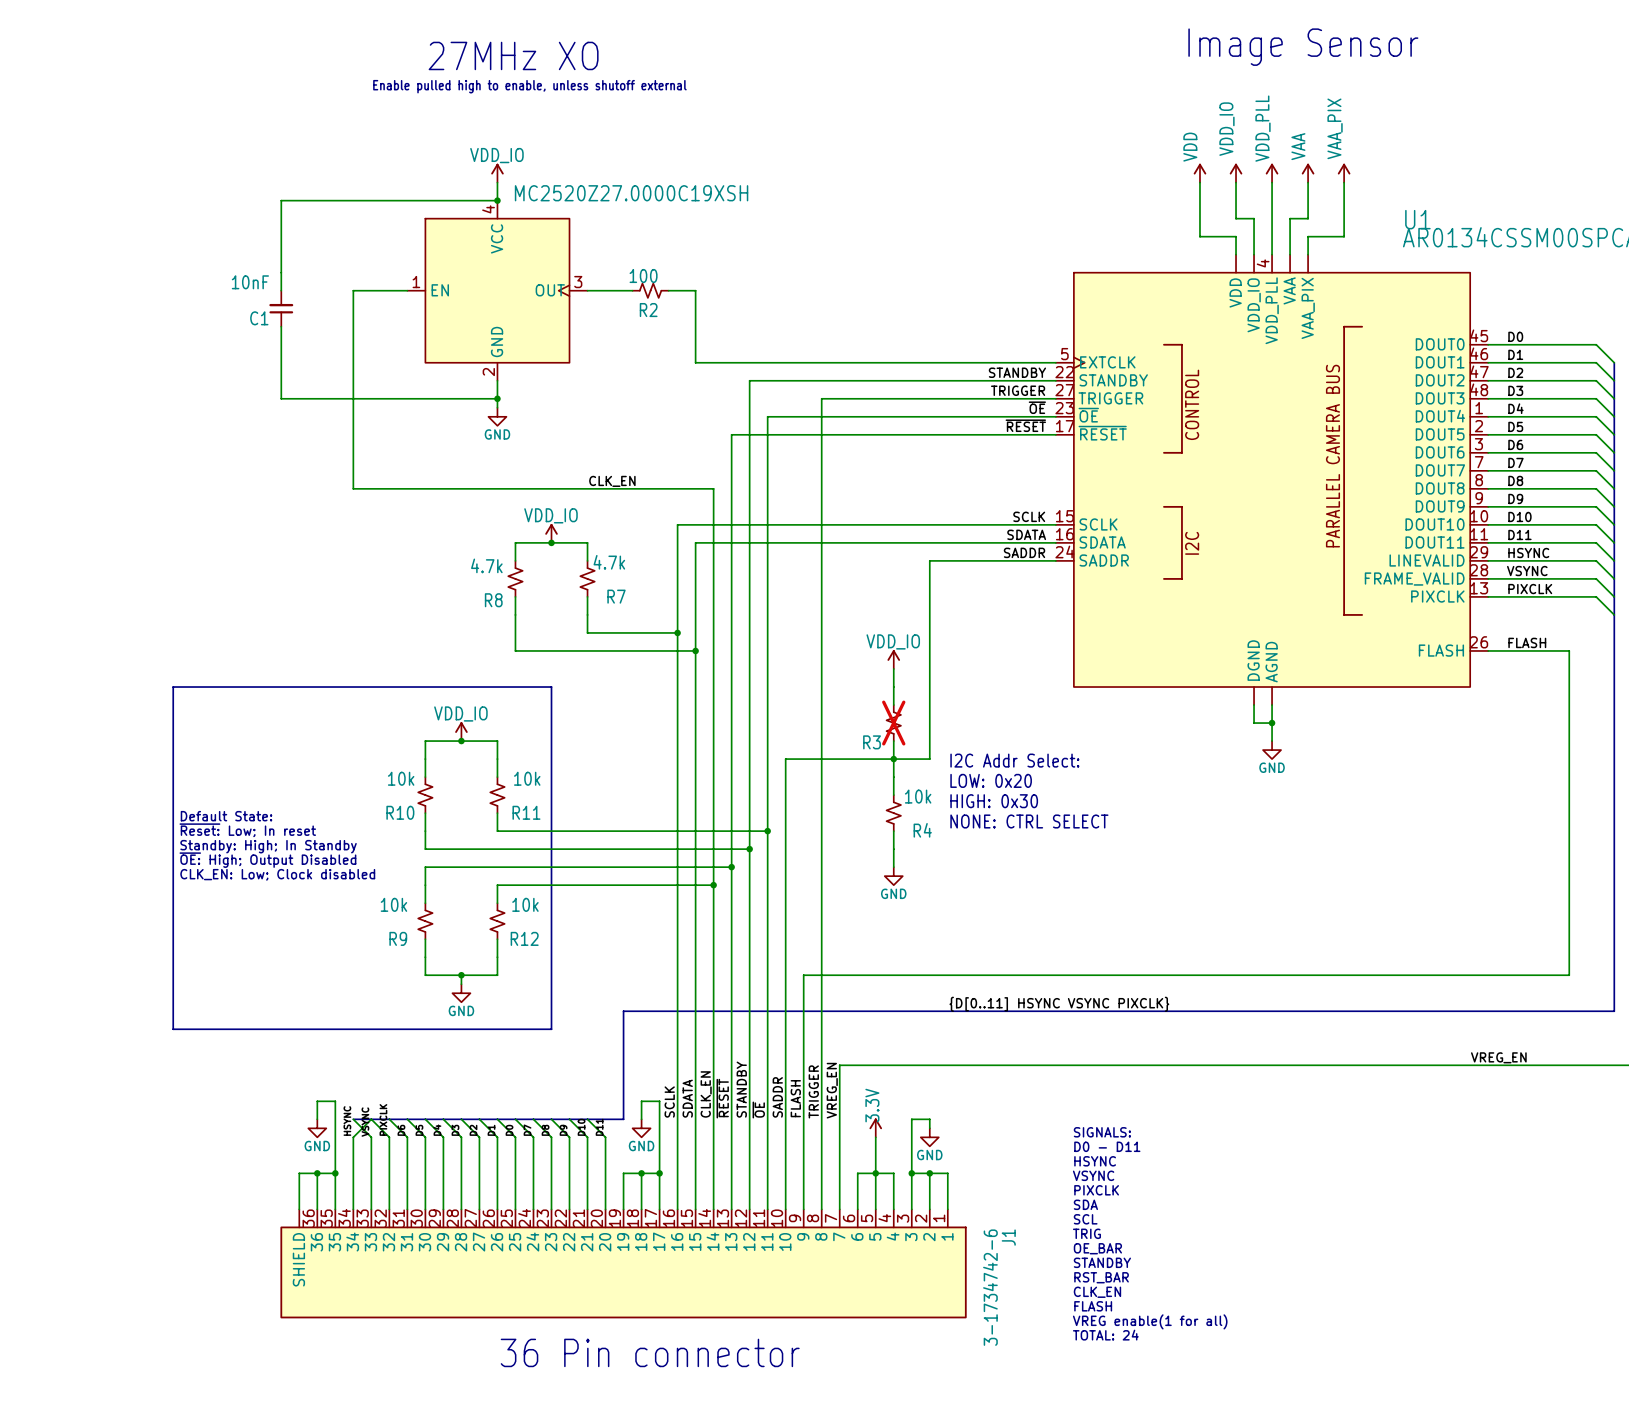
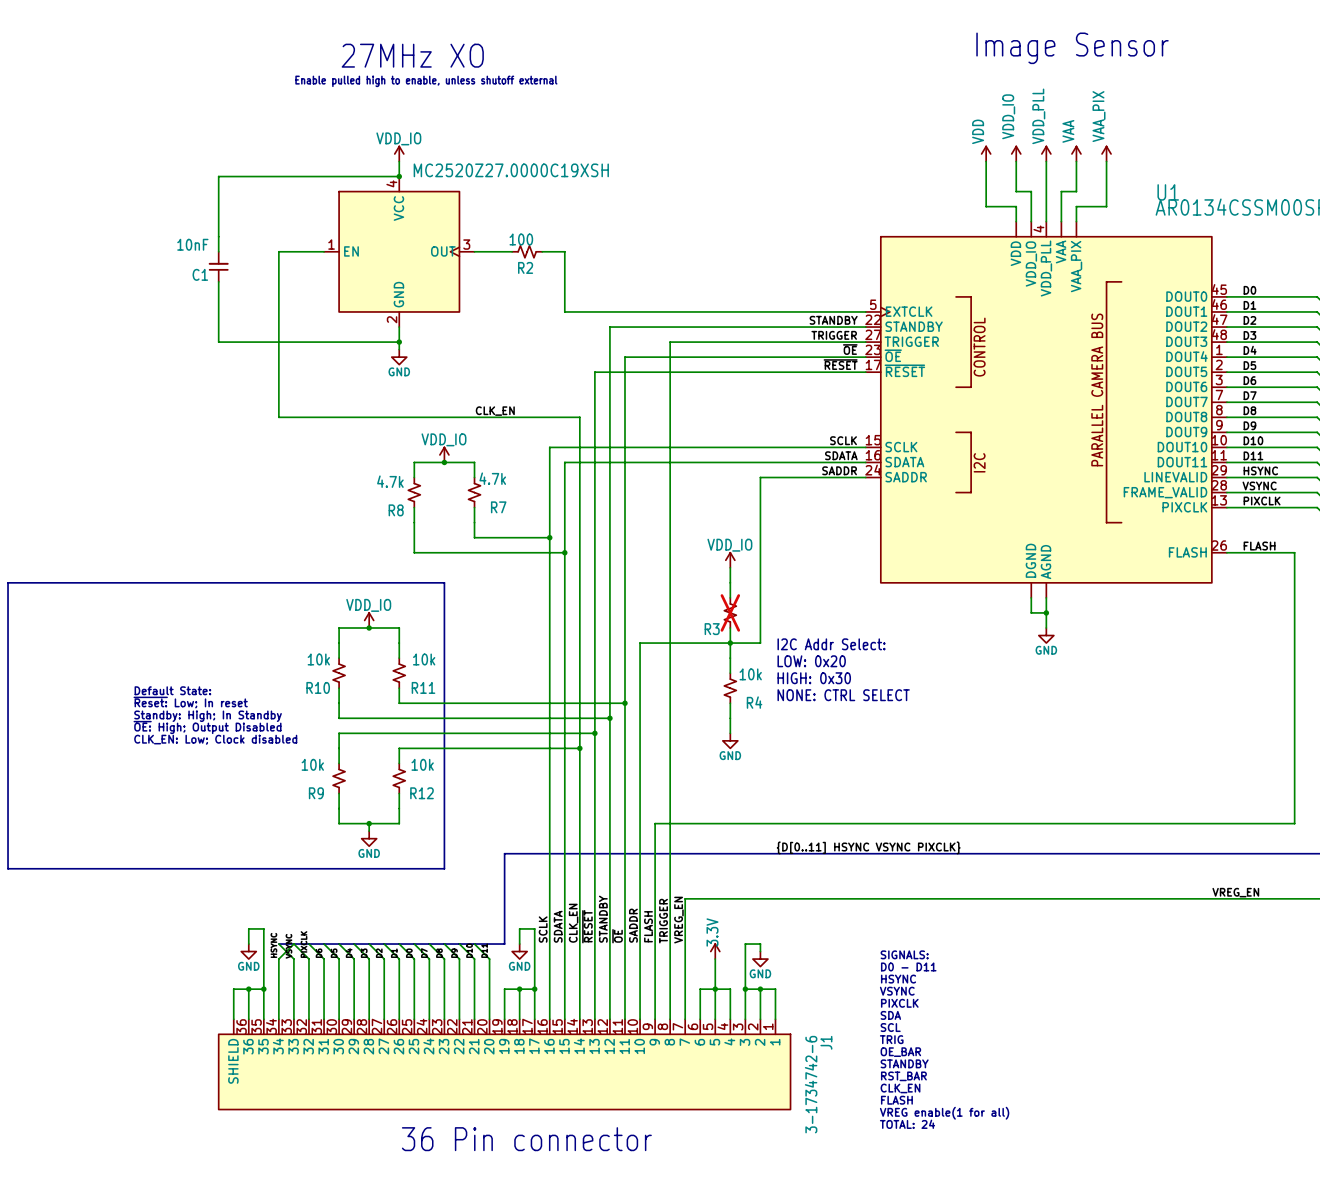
line: (173, 687) (173, 1029) -> (128, 582) (8, 582) (8, 868) (128, 868)

